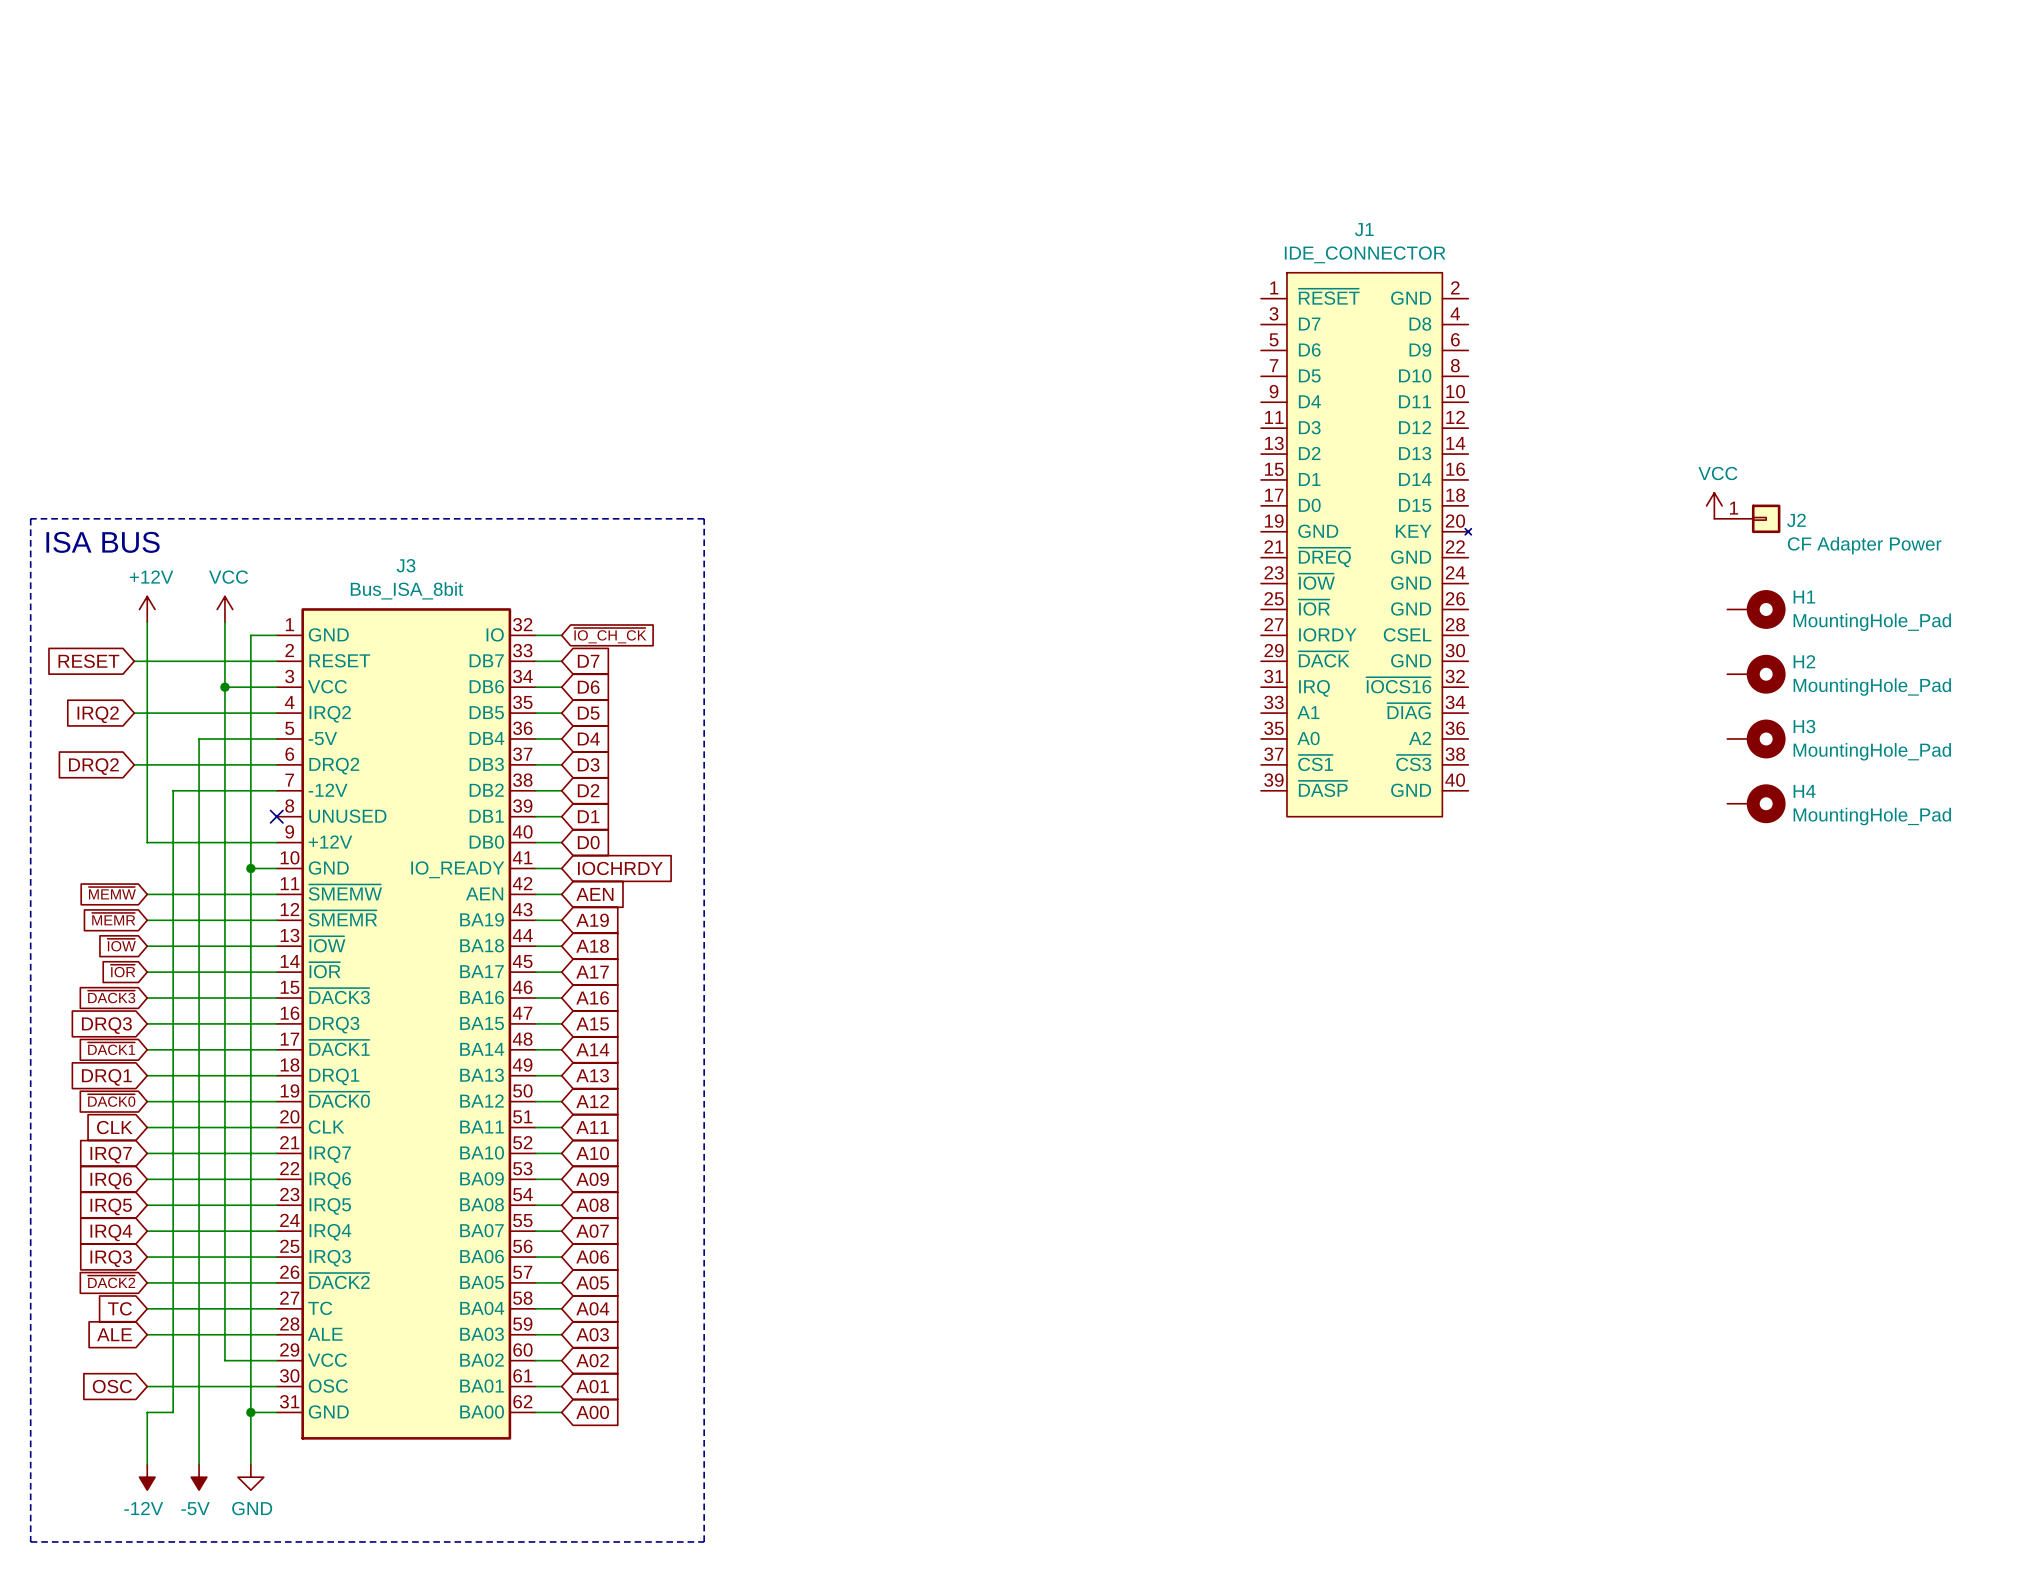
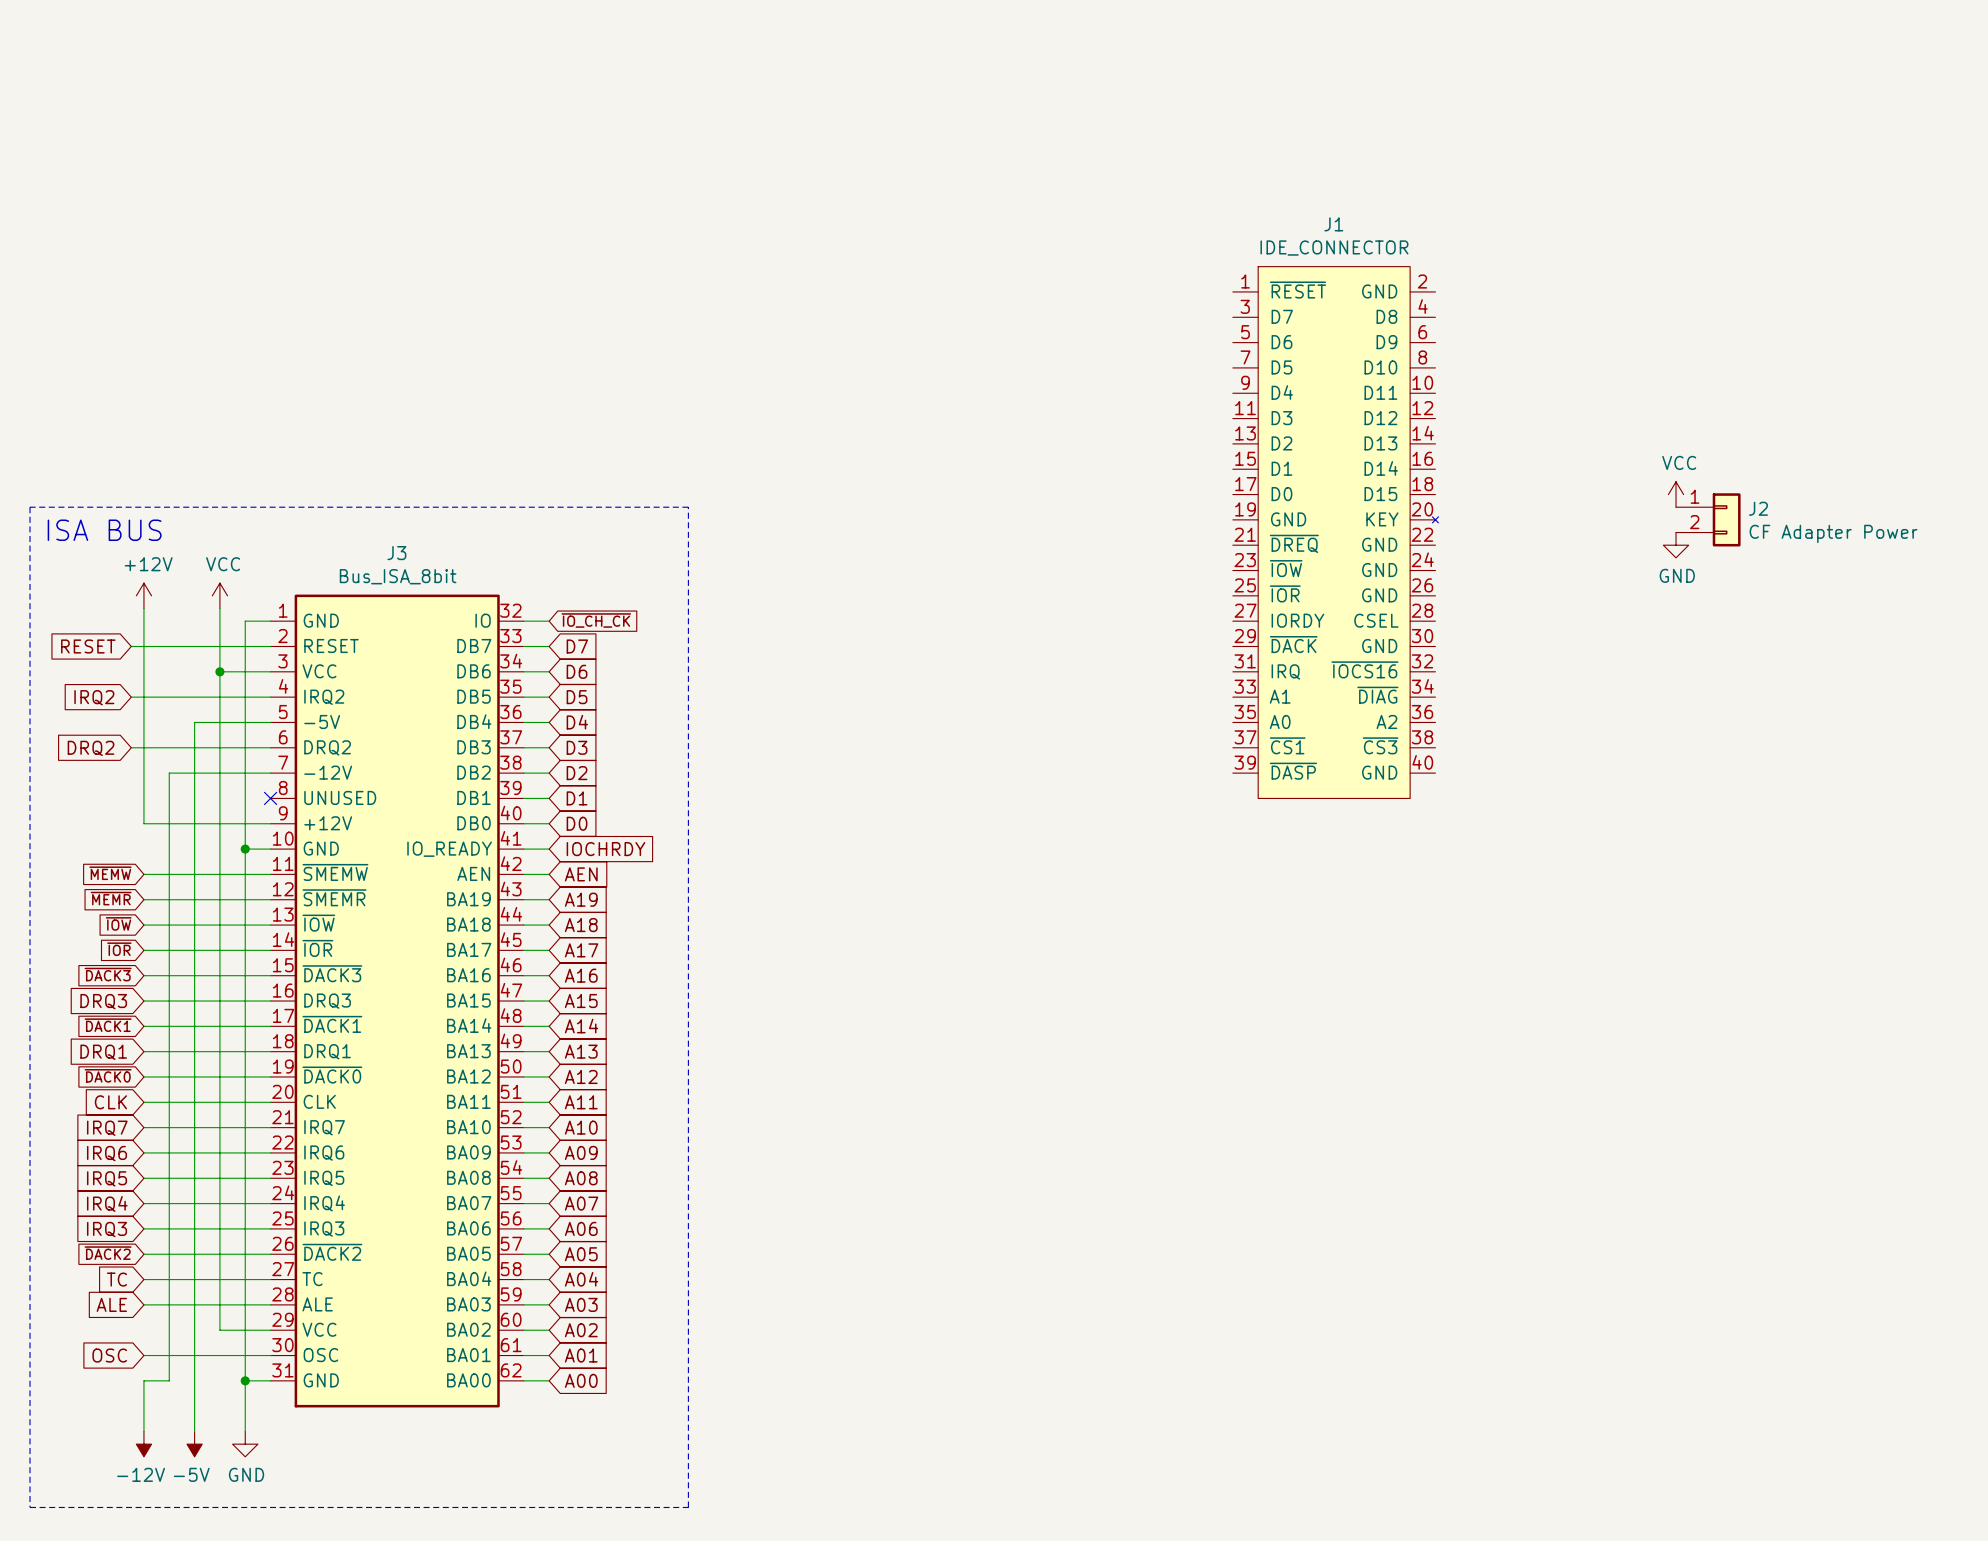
J2 symbol: [1714, 504, 1781, 534] -> [1676, 493, 1741, 547]
power symbol: none -> GND (1676, 545)
H1: MountingHole_Pad (1756, 609) -> none
H2: MountingHole_Pad (1756, 674) -> none
H3: MountingHole_Pad (1756, 738) -> none
H4: MountingHole_Pad (1756, 803) -> none

